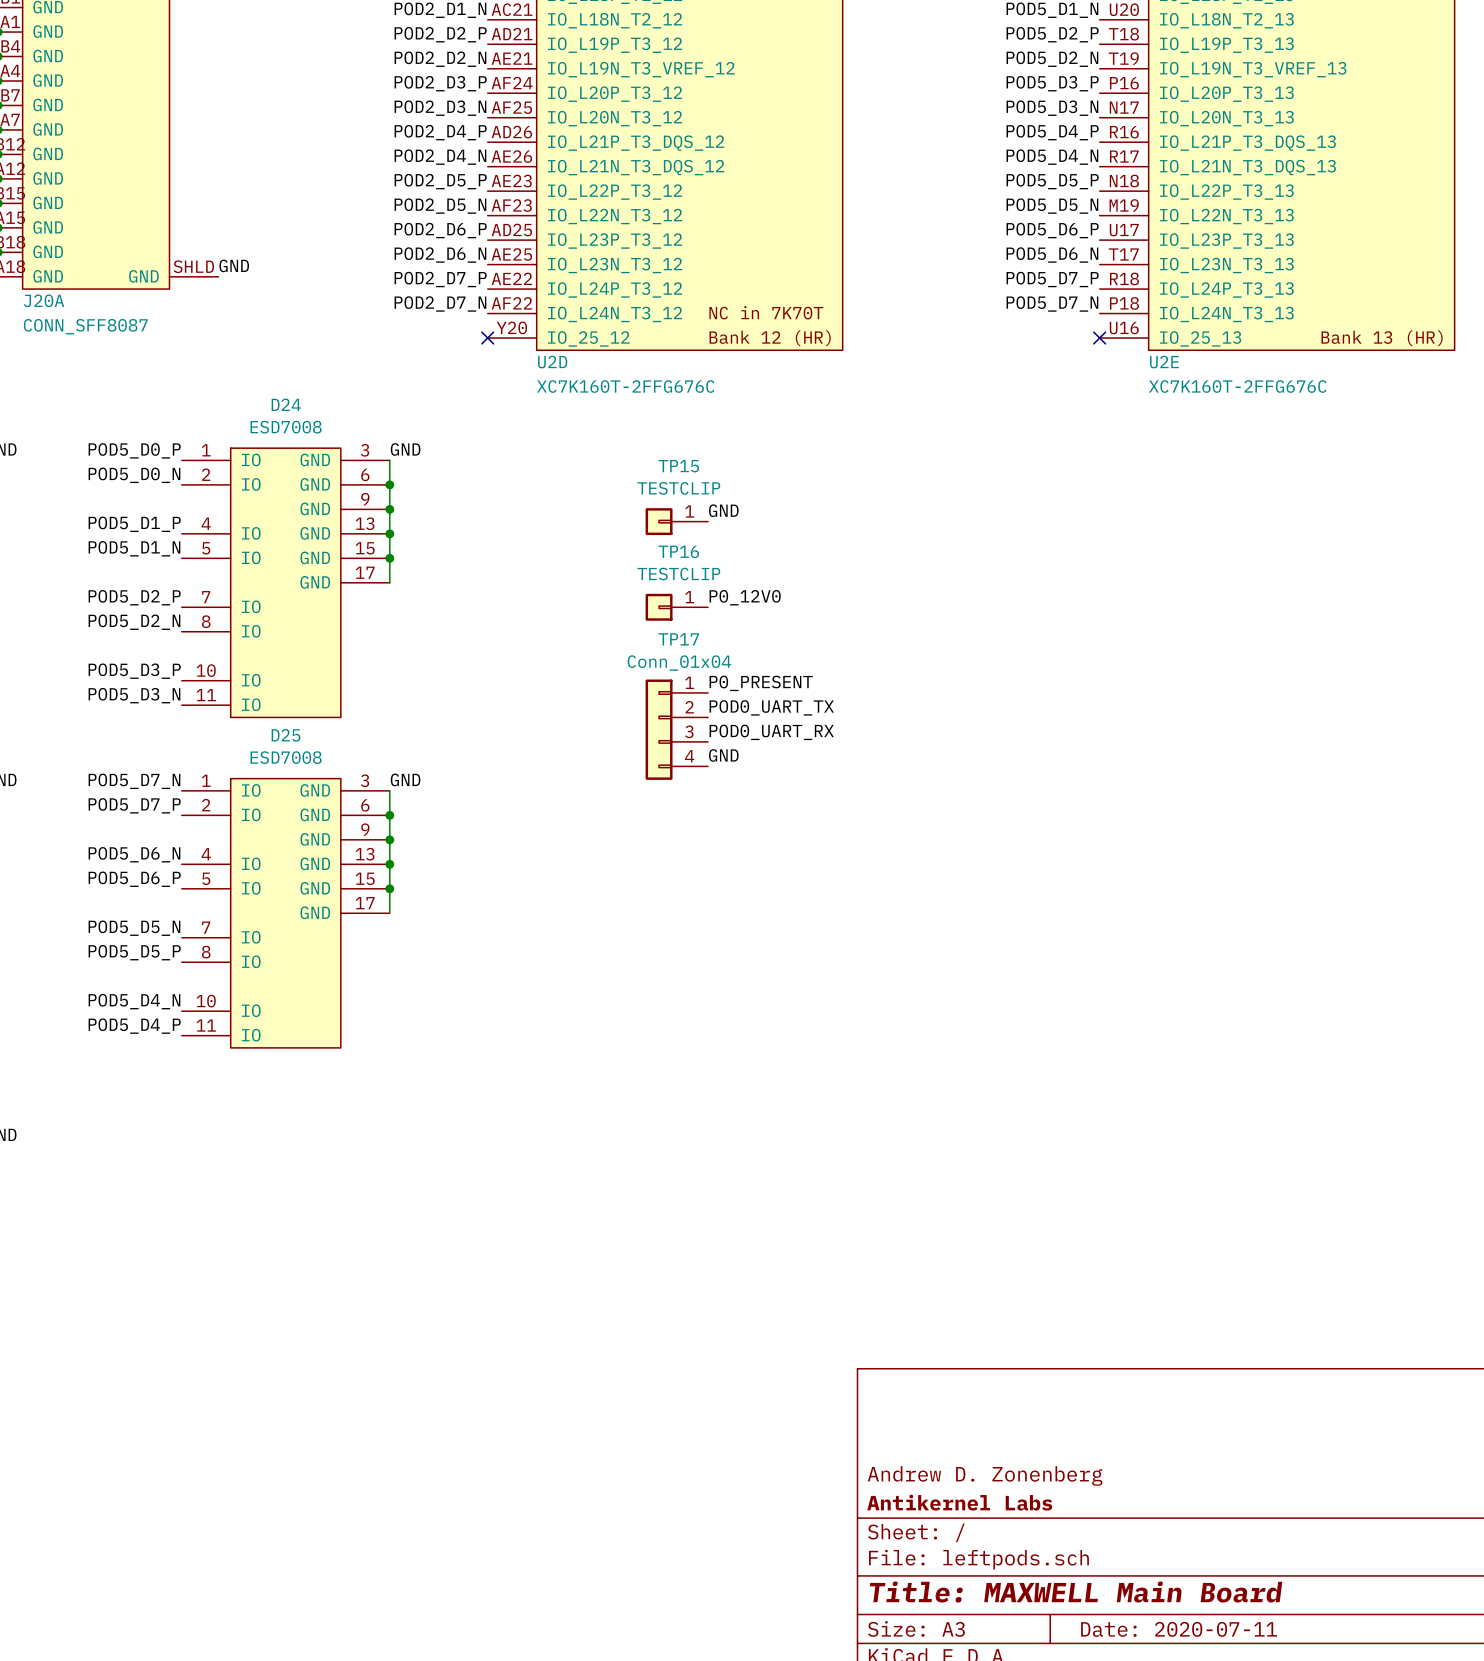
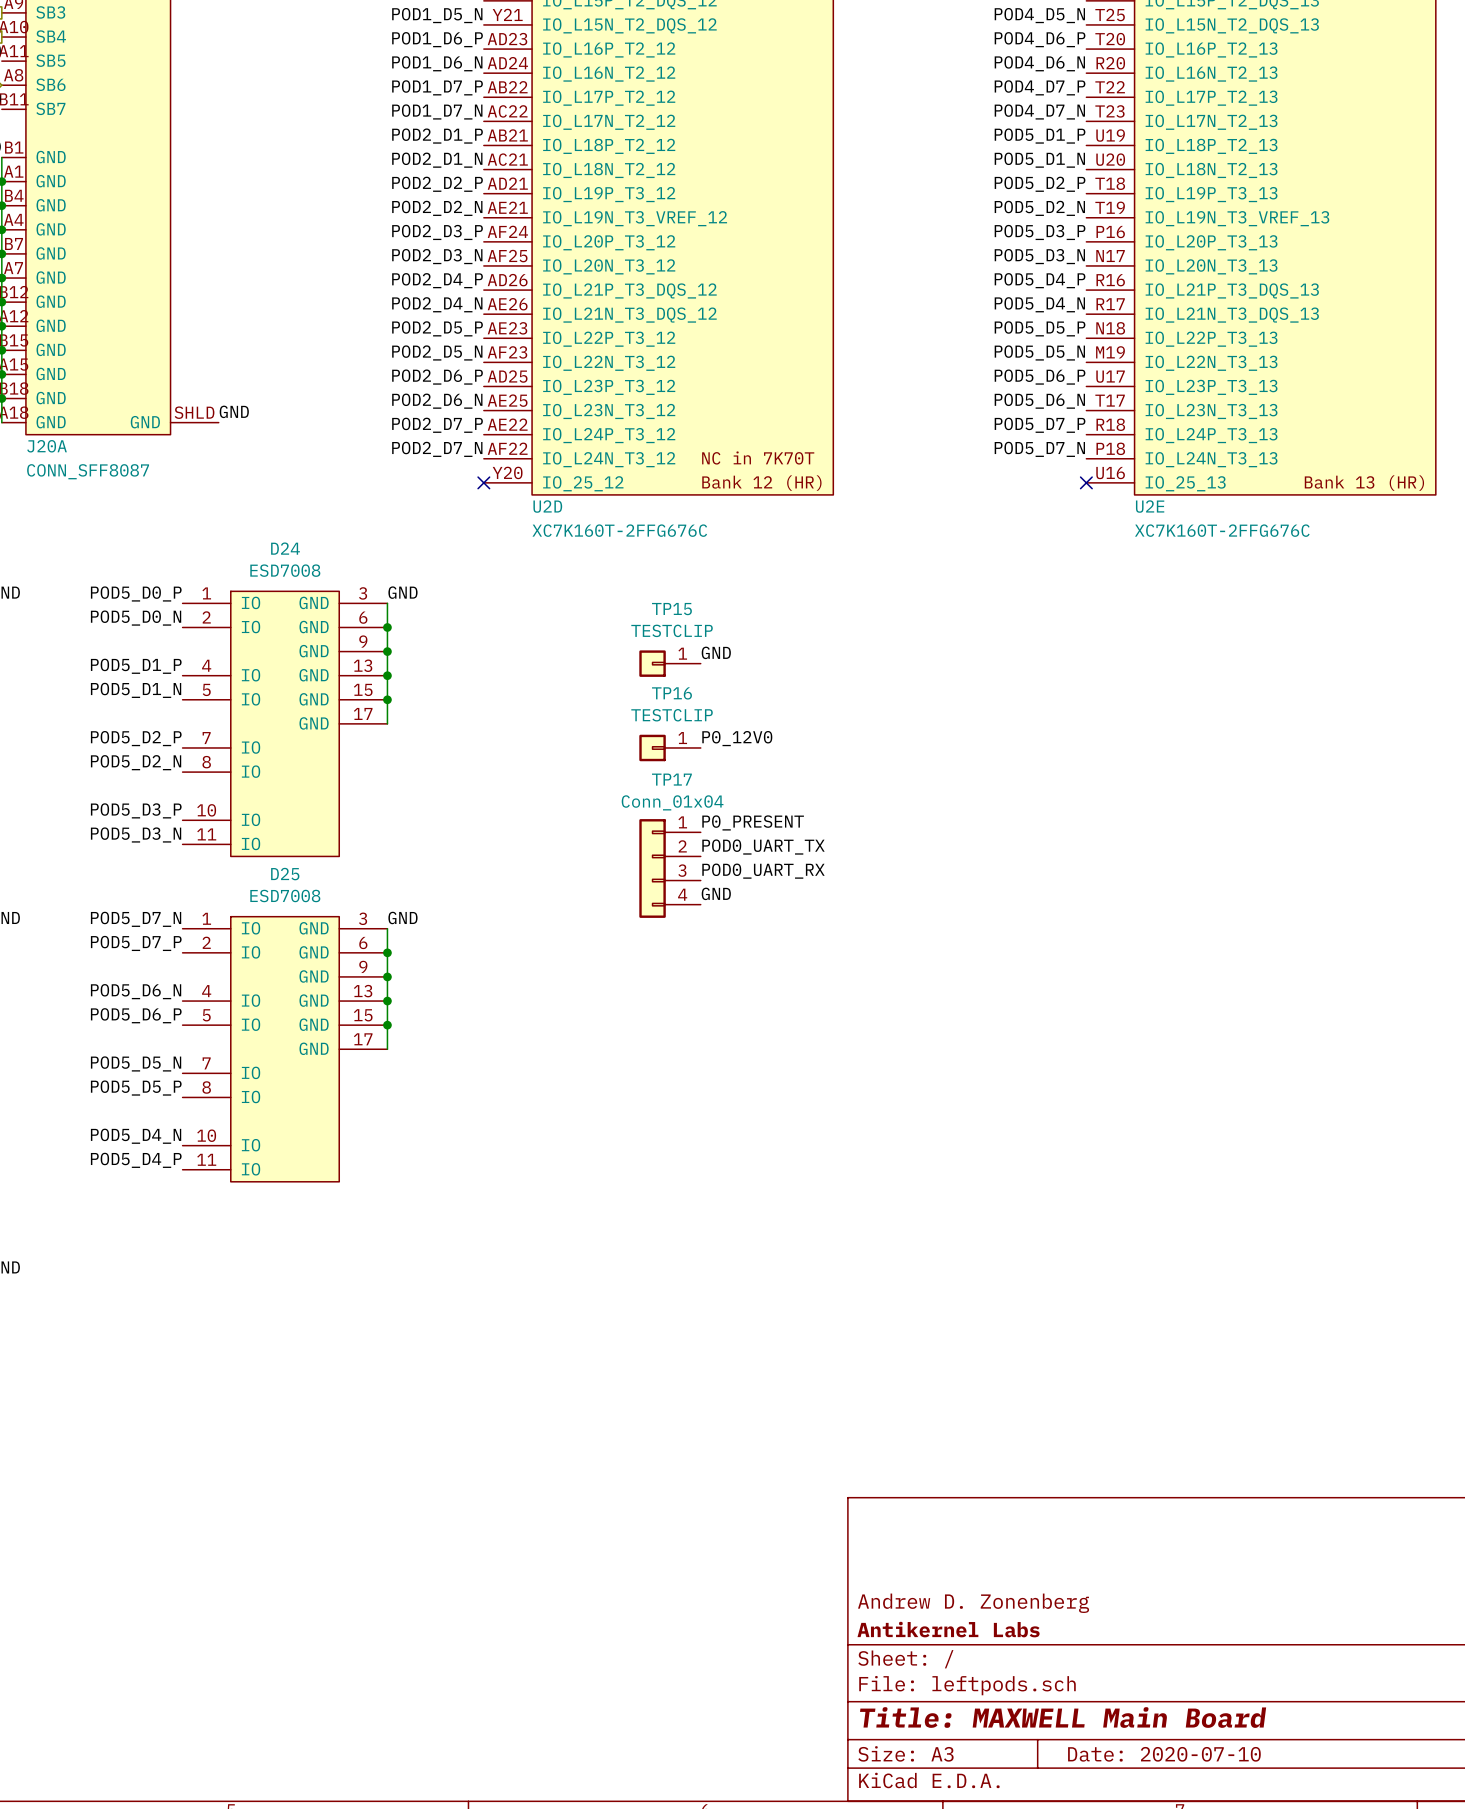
title block: Date: 2020-07-11 (1179, 1629) -> Date: 2020-07-10 (1164, 1754)

